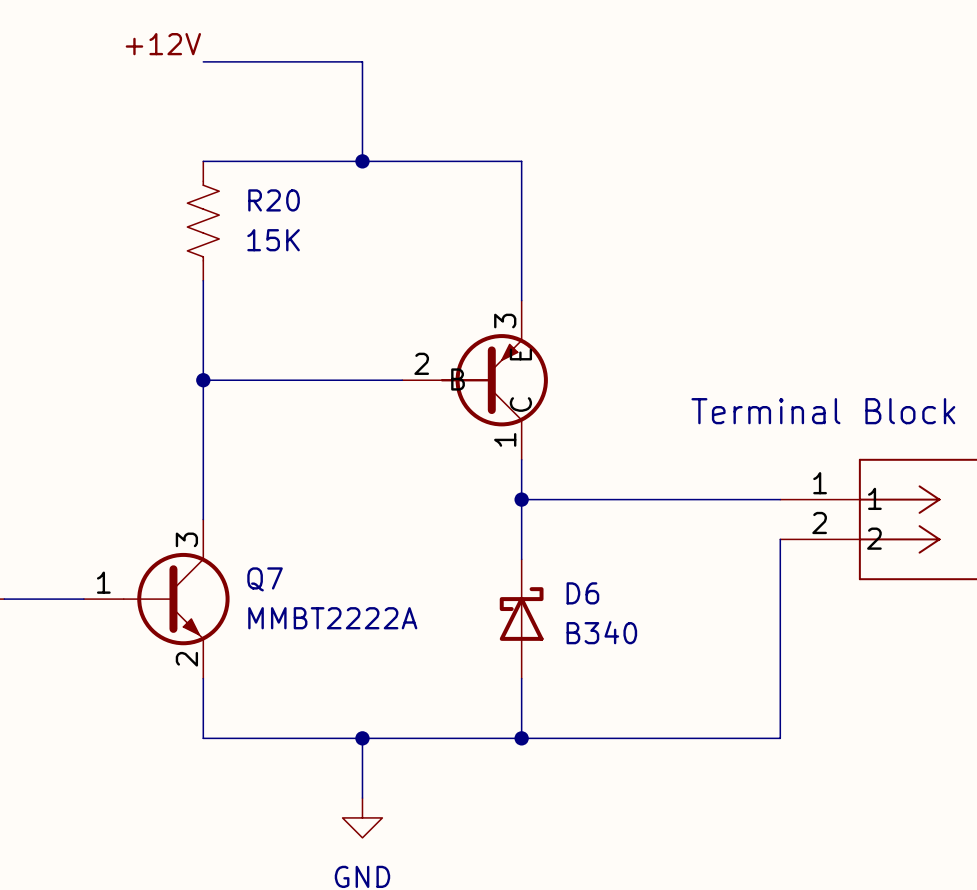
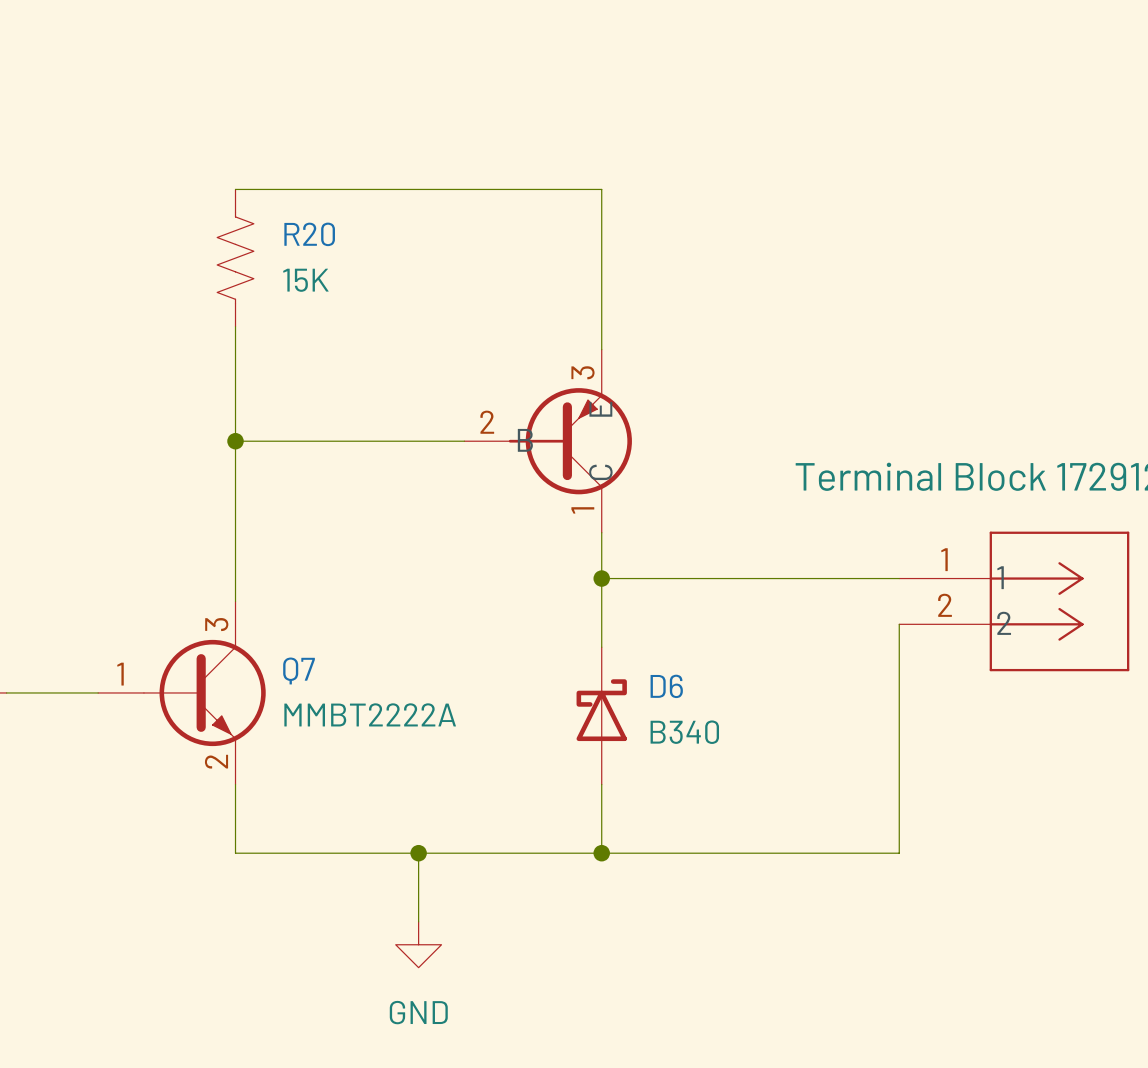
label: +12V (163, 44) -> none
wire: (203, 61) (362, 61) (362, 161) -> none
junction: (362, 161) -> none

